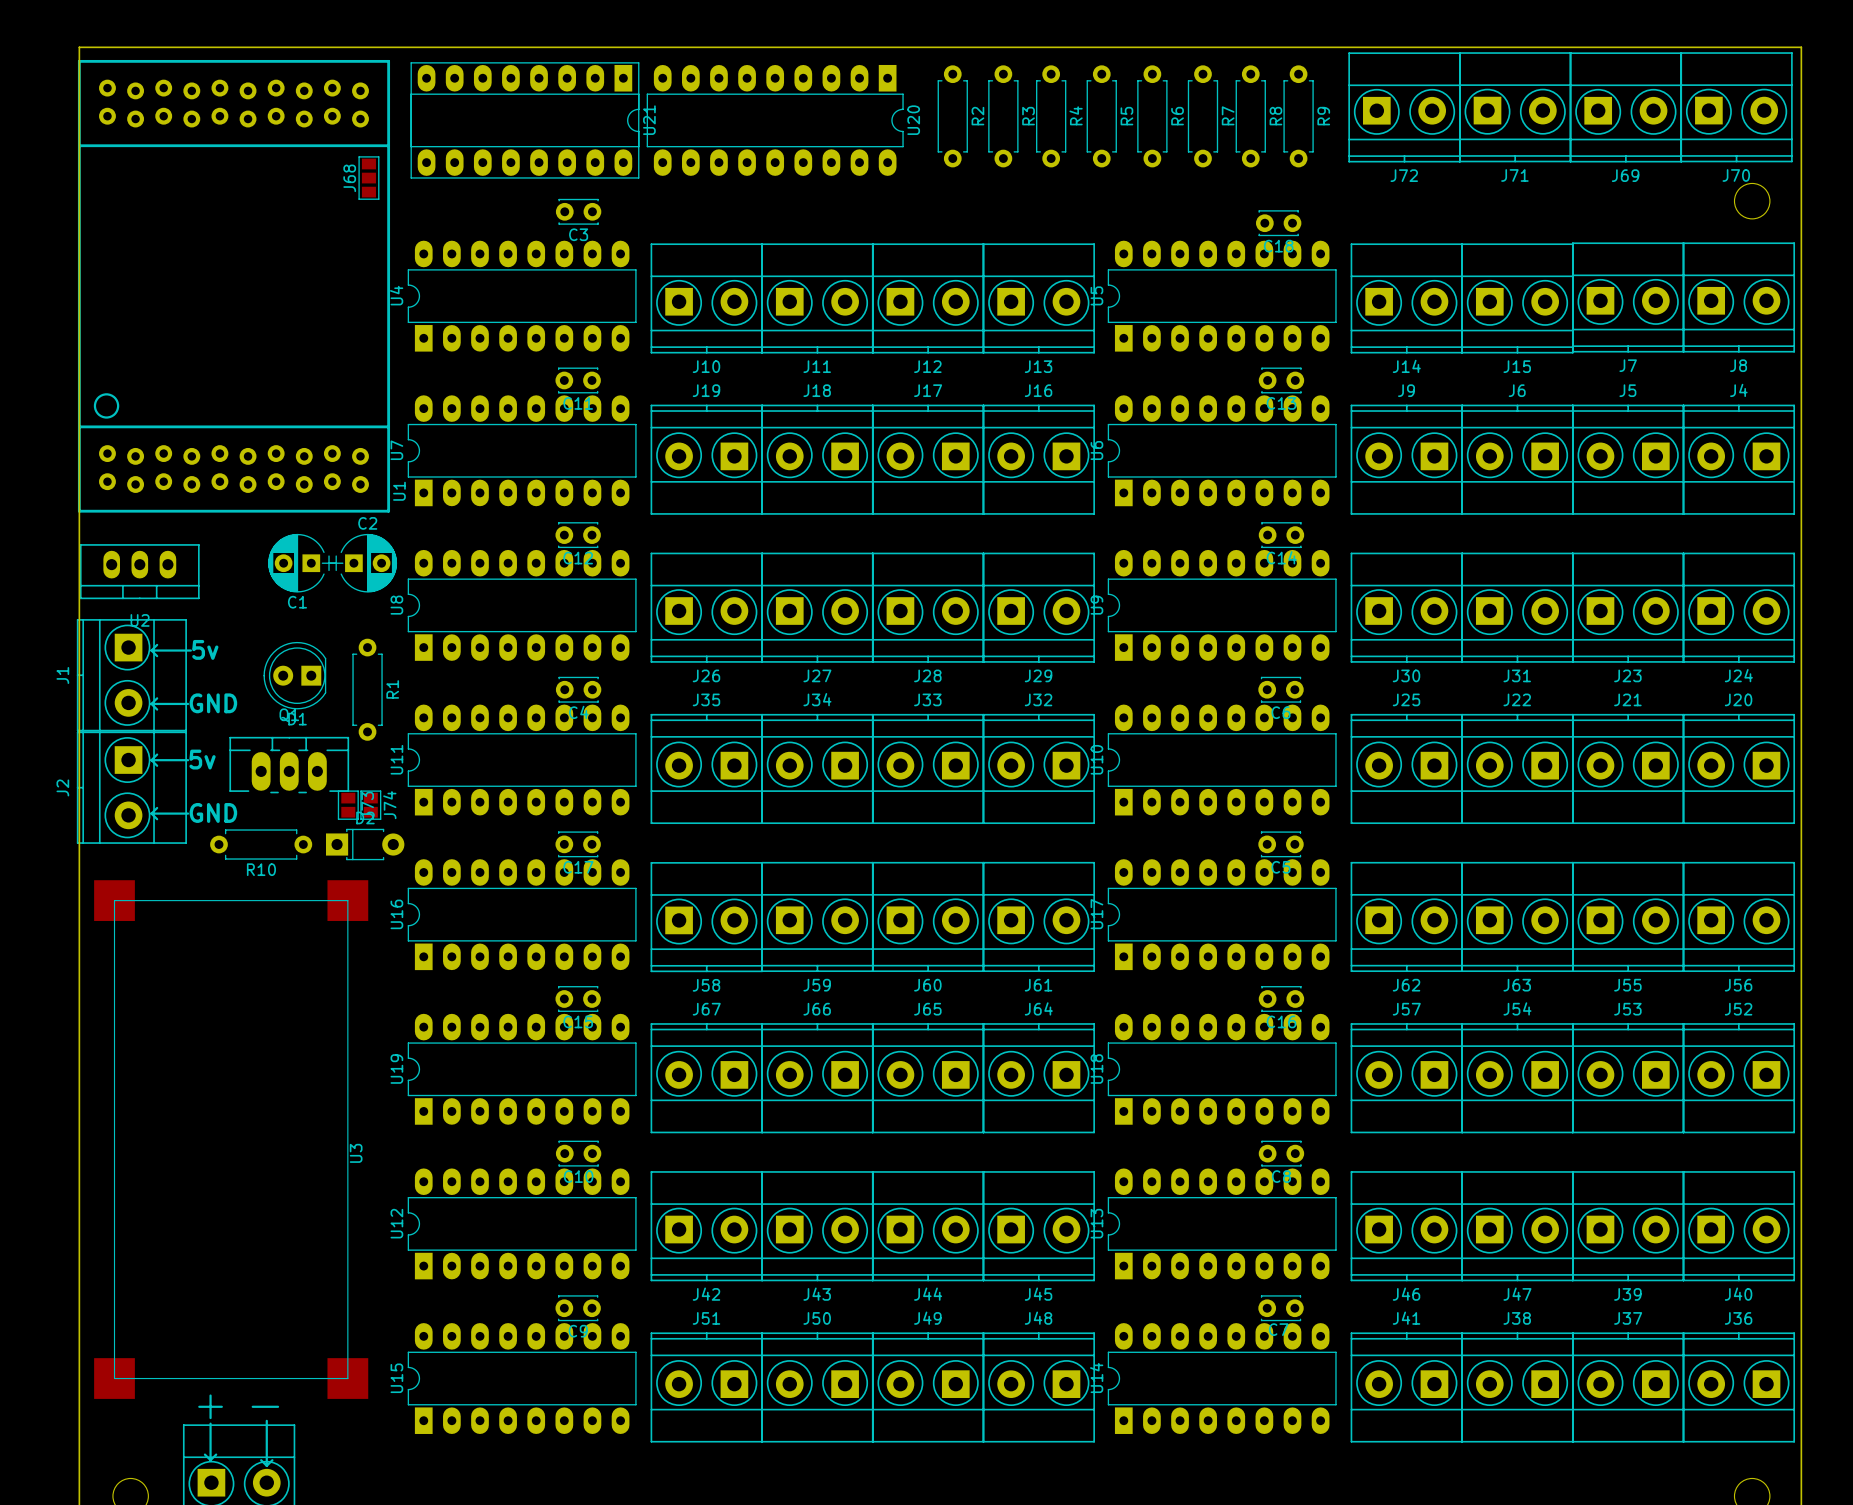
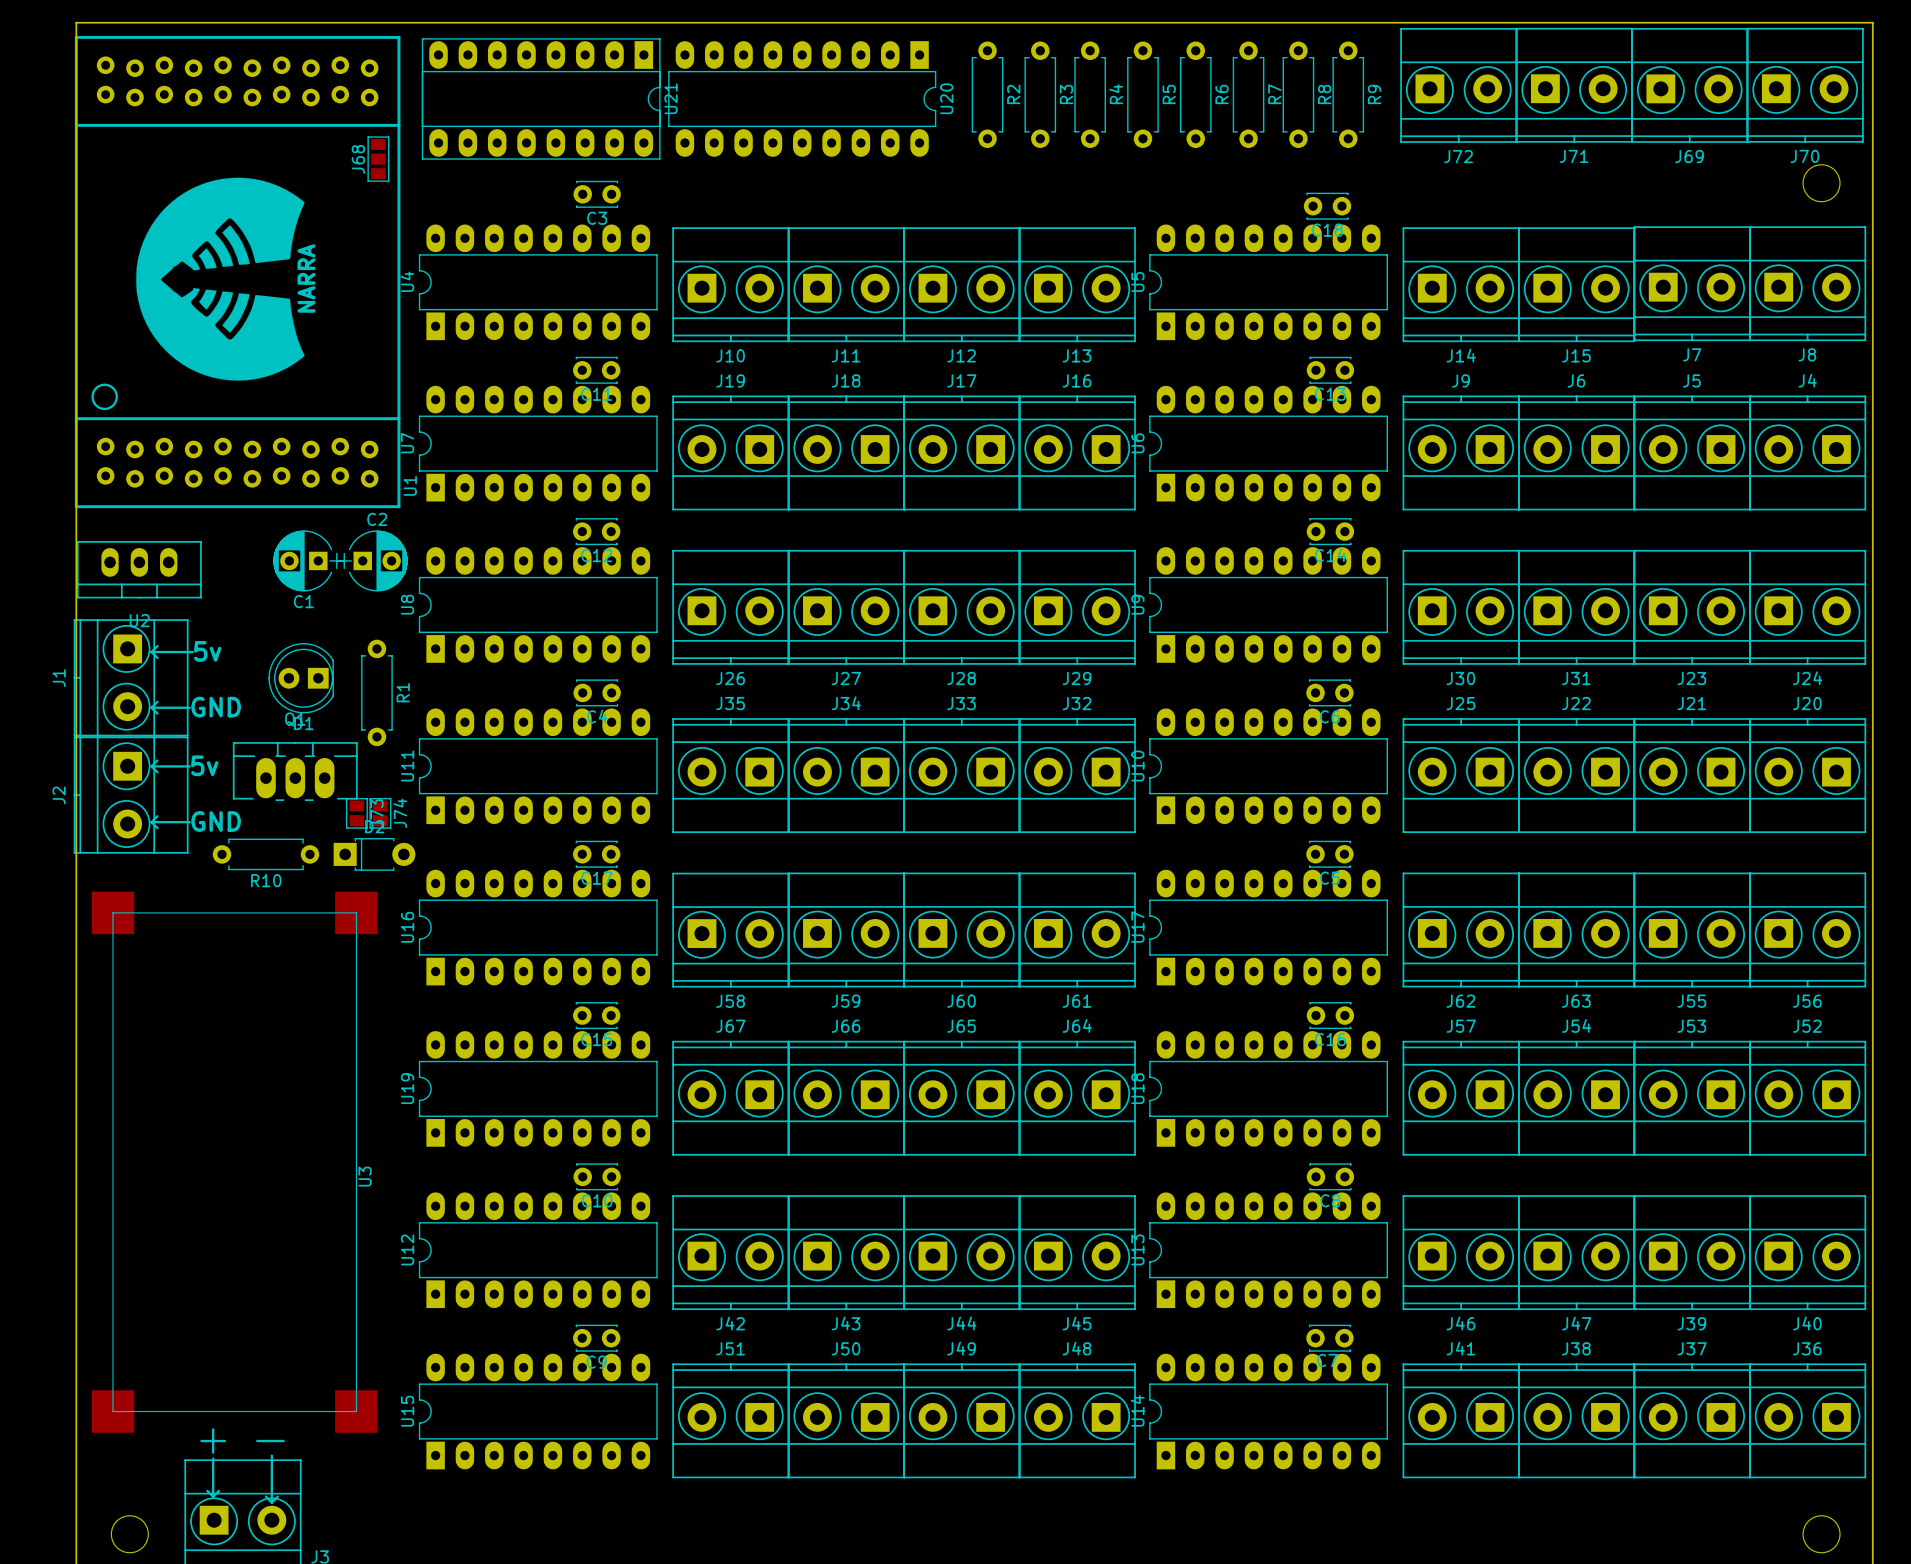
drawing: none -> [136, 177, 305, 381]

